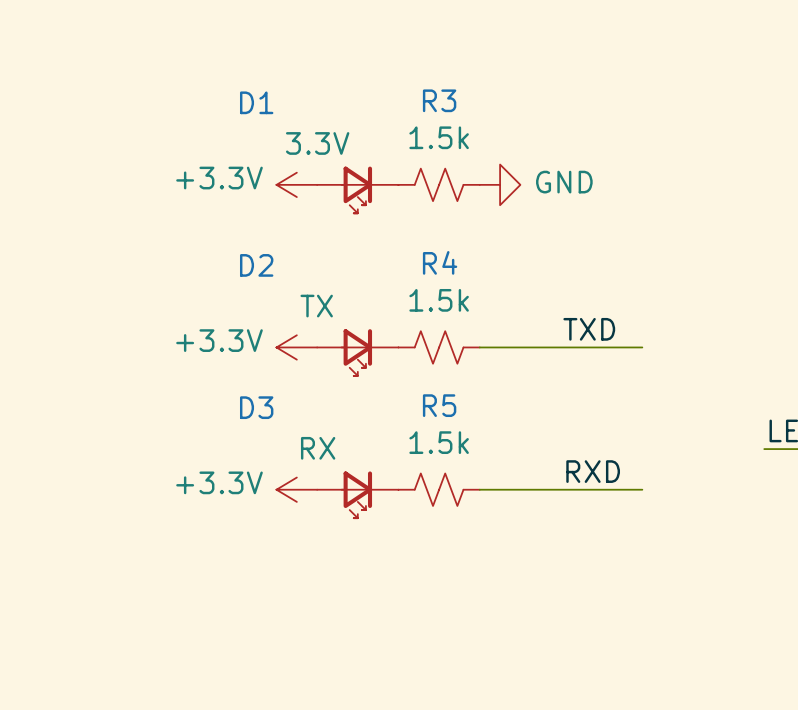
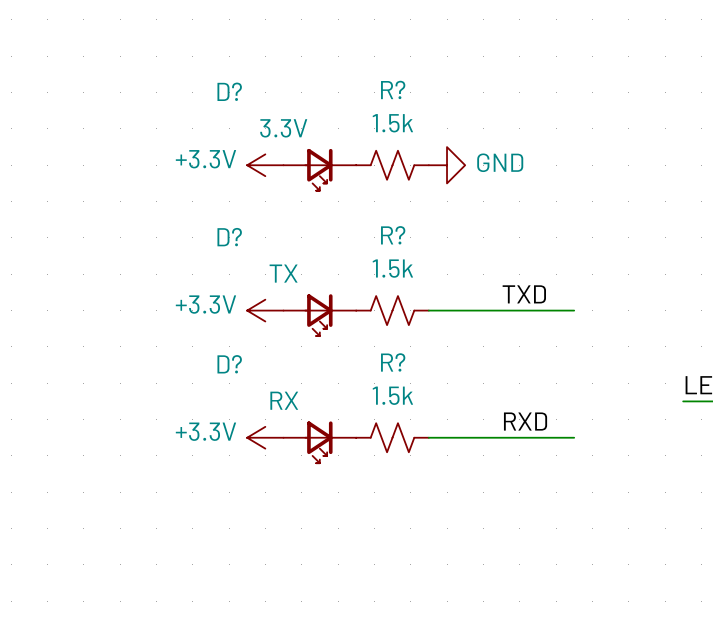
R3 name: R3 (439, 100) -> R? (393, 89)
D1 name: D1 (256, 102) -> D? (229, 91)
R4 name: R4 (440, 262) -> R? (393, 235)
D2 name: D2 (256, 265) -> D? (229, 237)
R5 name: R5 (439, 405) -> R? (393, 362)
D3 name: D3 (256, 407) -> D? (229, 364)

